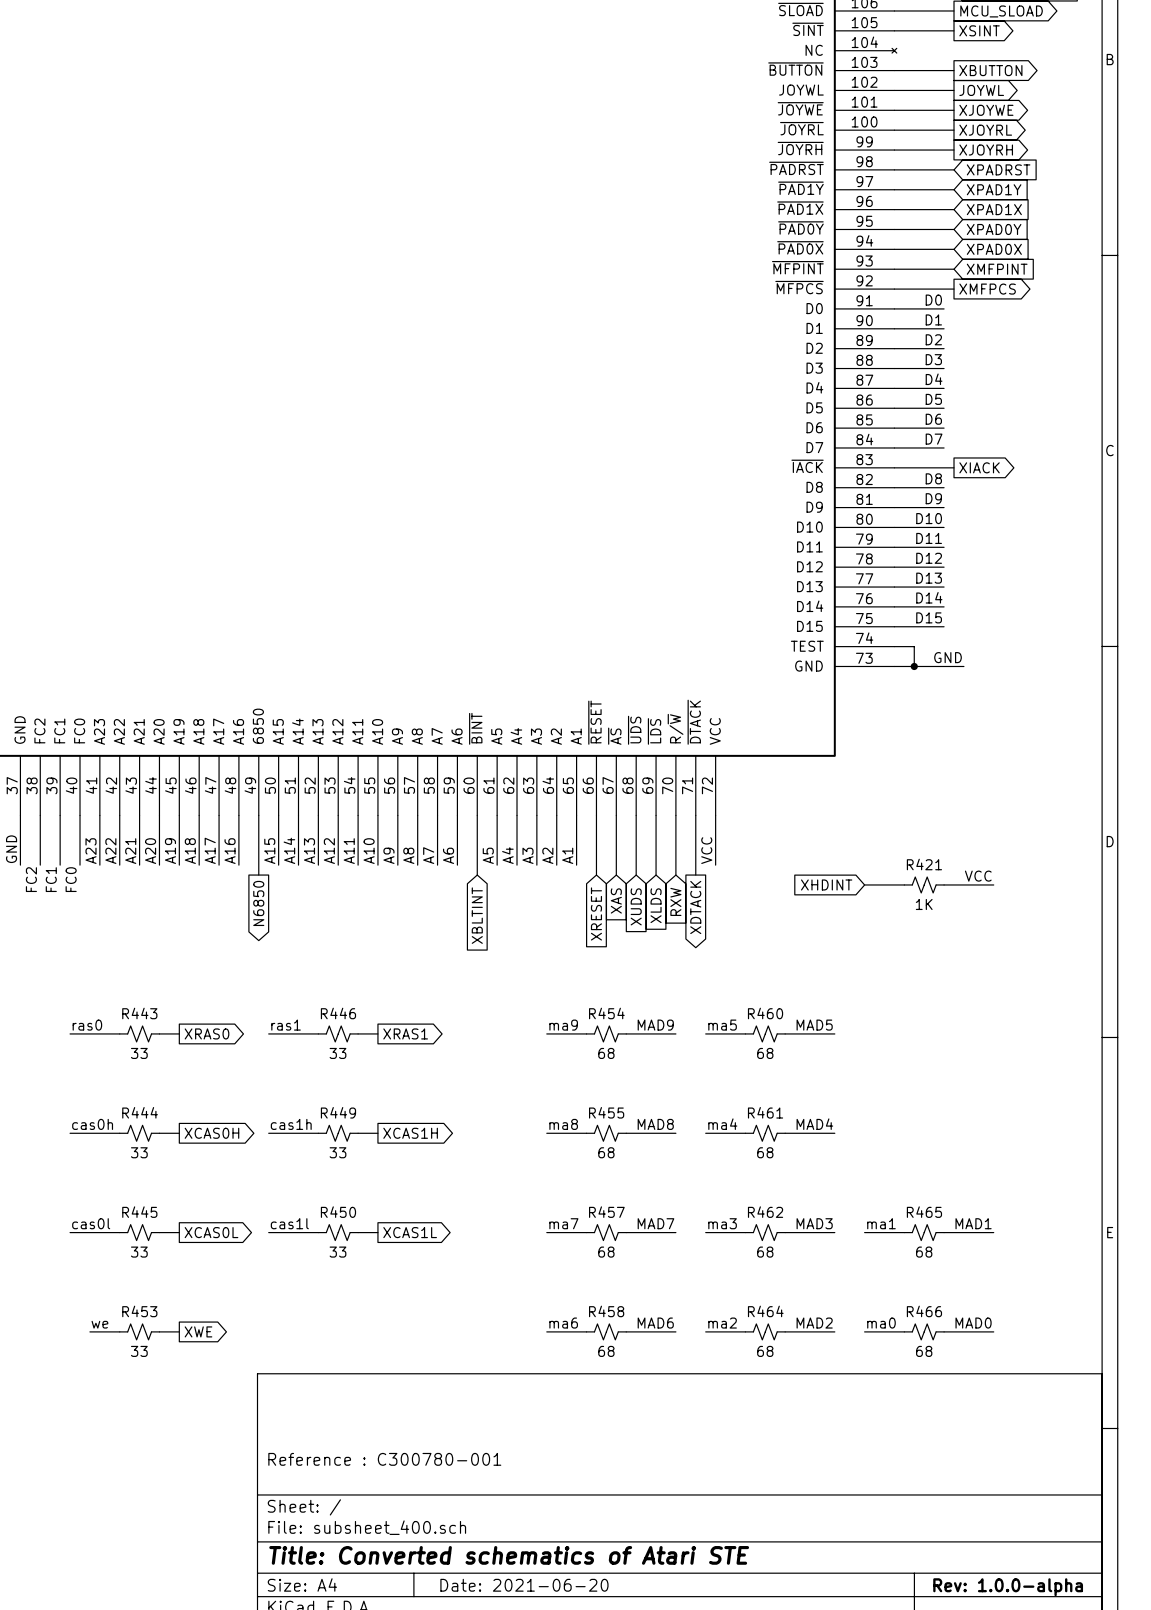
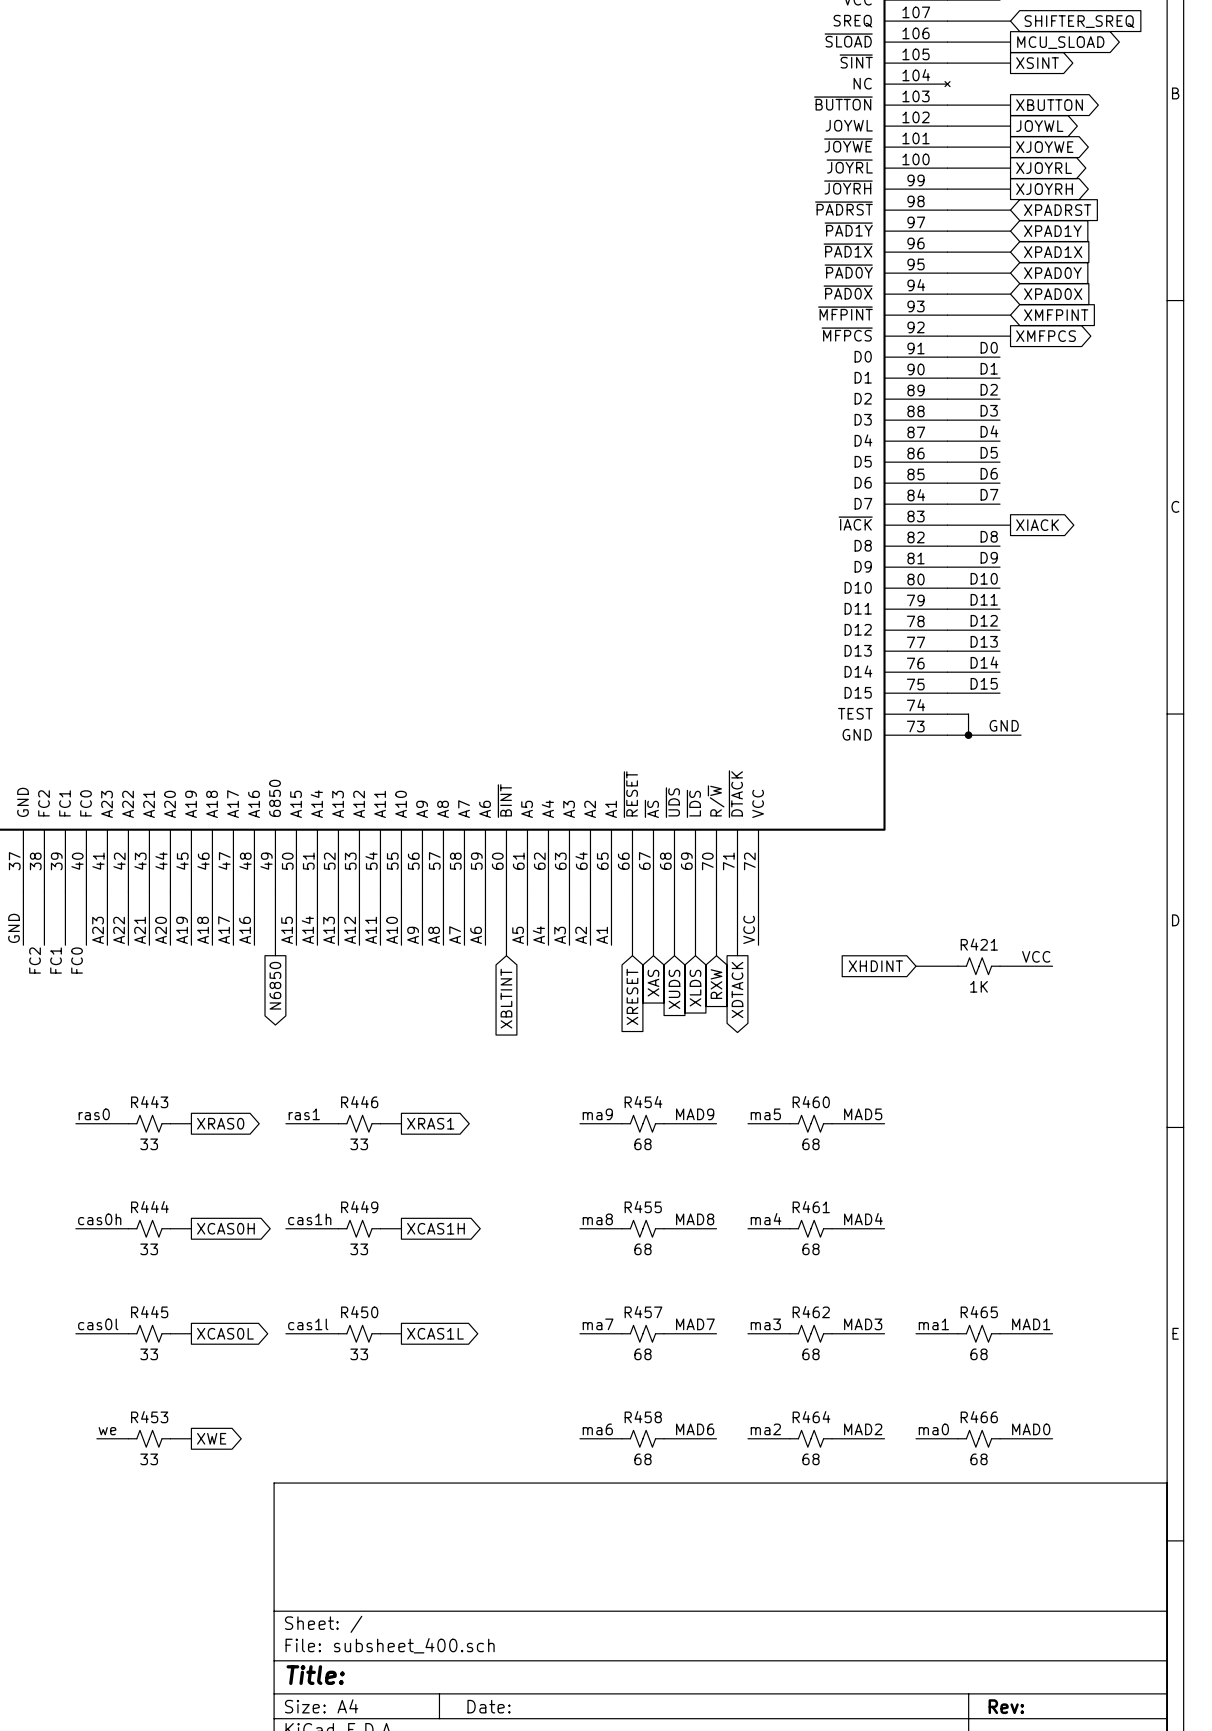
title block: Reference : C300780-001 (384, 1459) -> none
title block: Title: Converted schematics of Atari STE (509, 1555) -> Title: (315, 1675)
title block: Date: 2021-06-20 (524, 1585) -> Date: (489, 1706)
title block: Rev: 1.0.0-alpha (1008, 1587) -> Rev: (1006, 1706)

